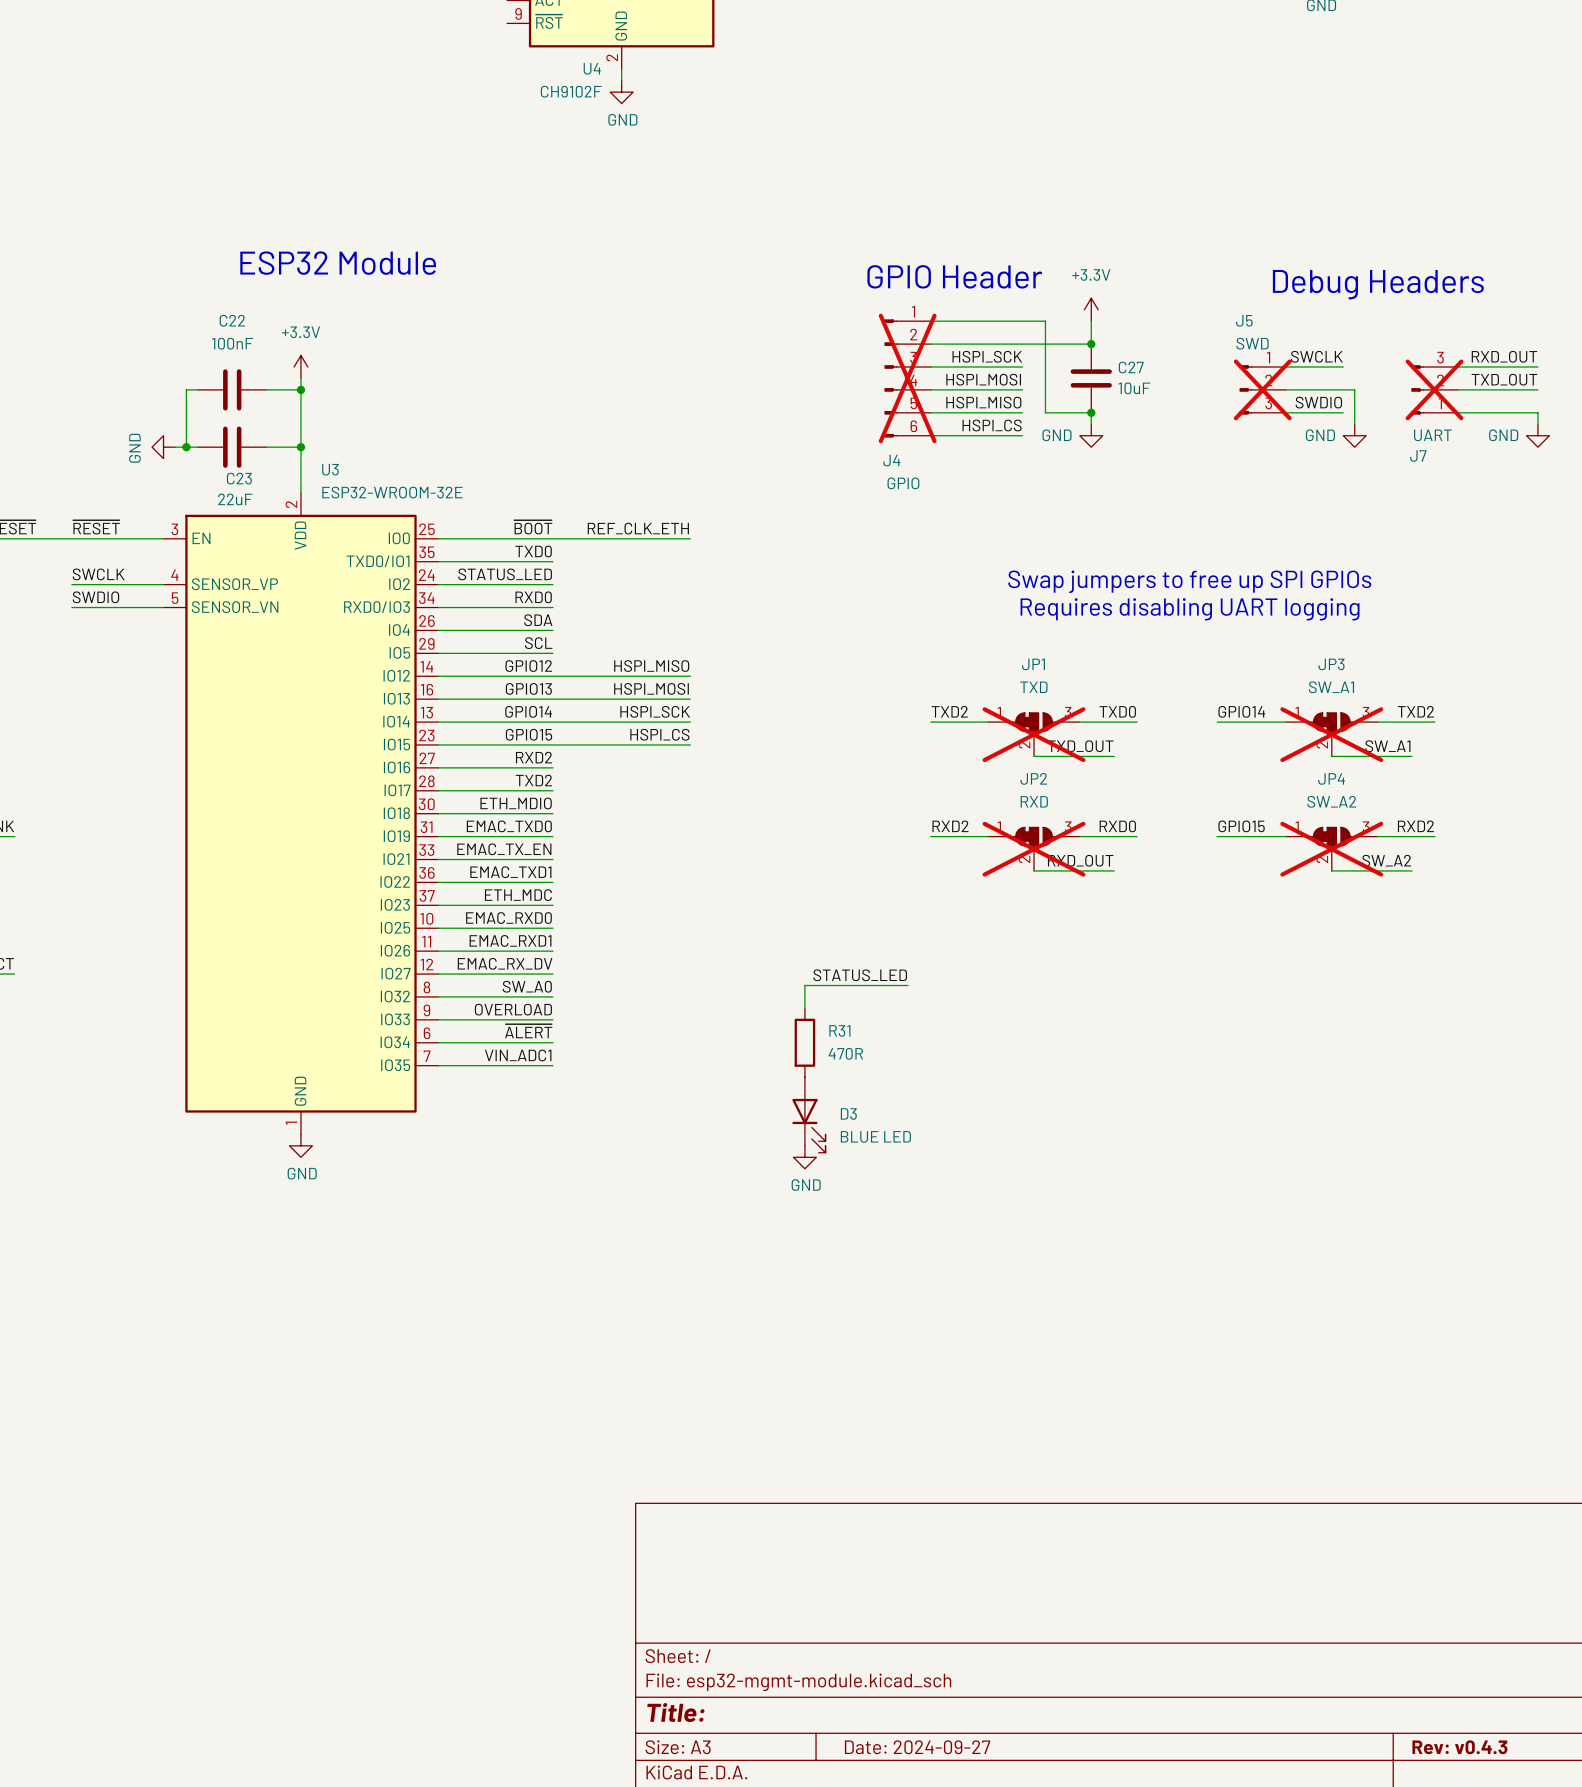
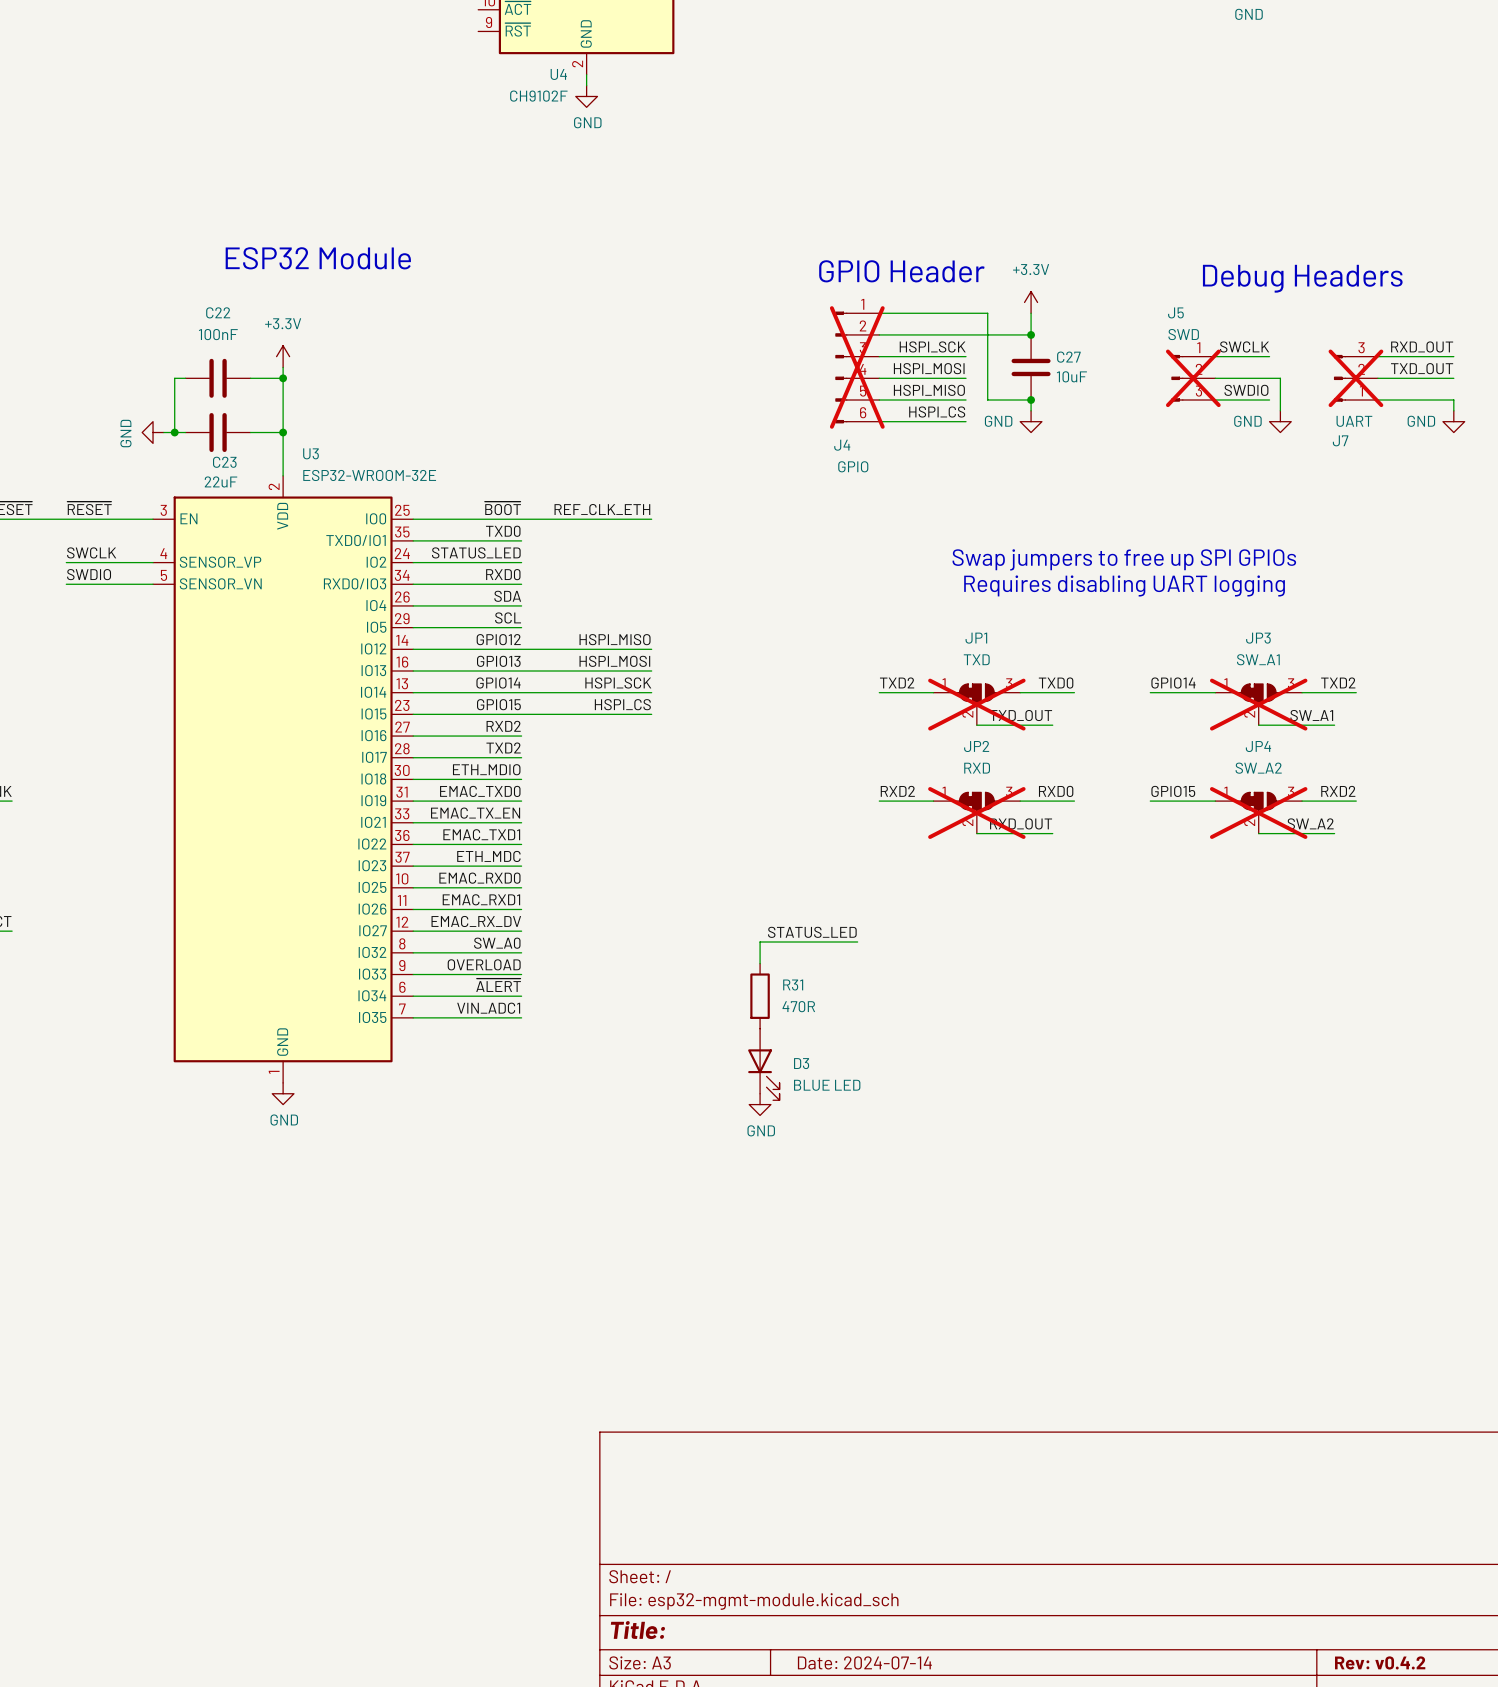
title block: Date: 2024-09-27 (917, 1747) -> Date: 2024-07-14 (864, 1662)
title block: Rev: v0.4.3 (1459, 1747) -> Rev: v0.4.2 (1380, 1662)

